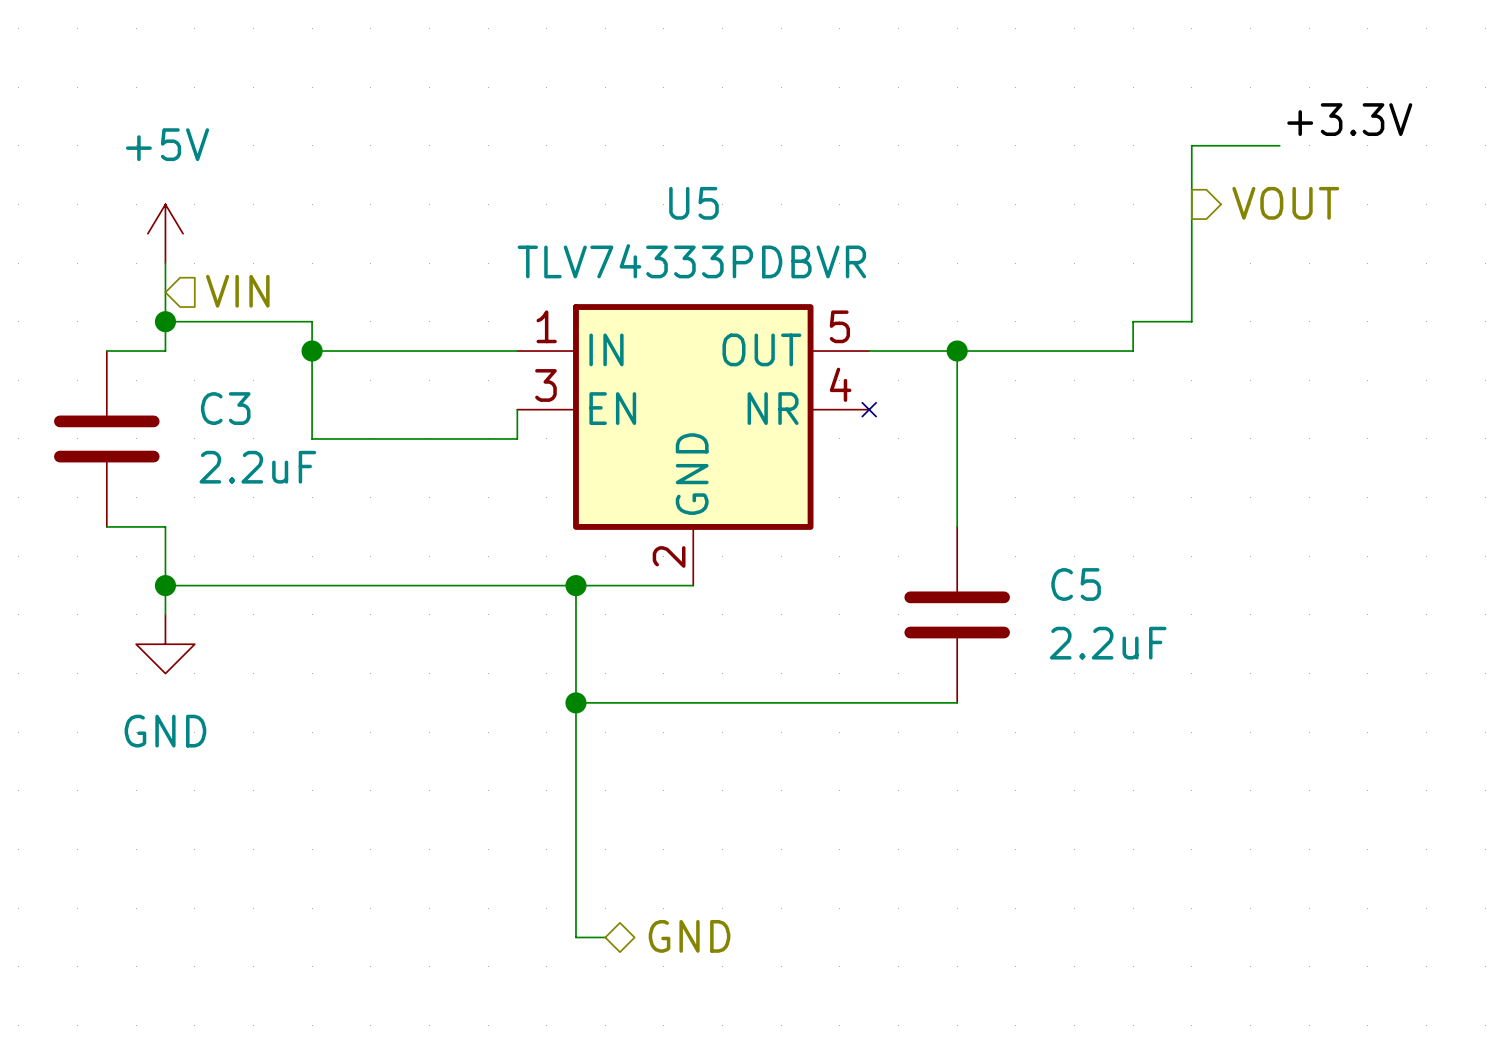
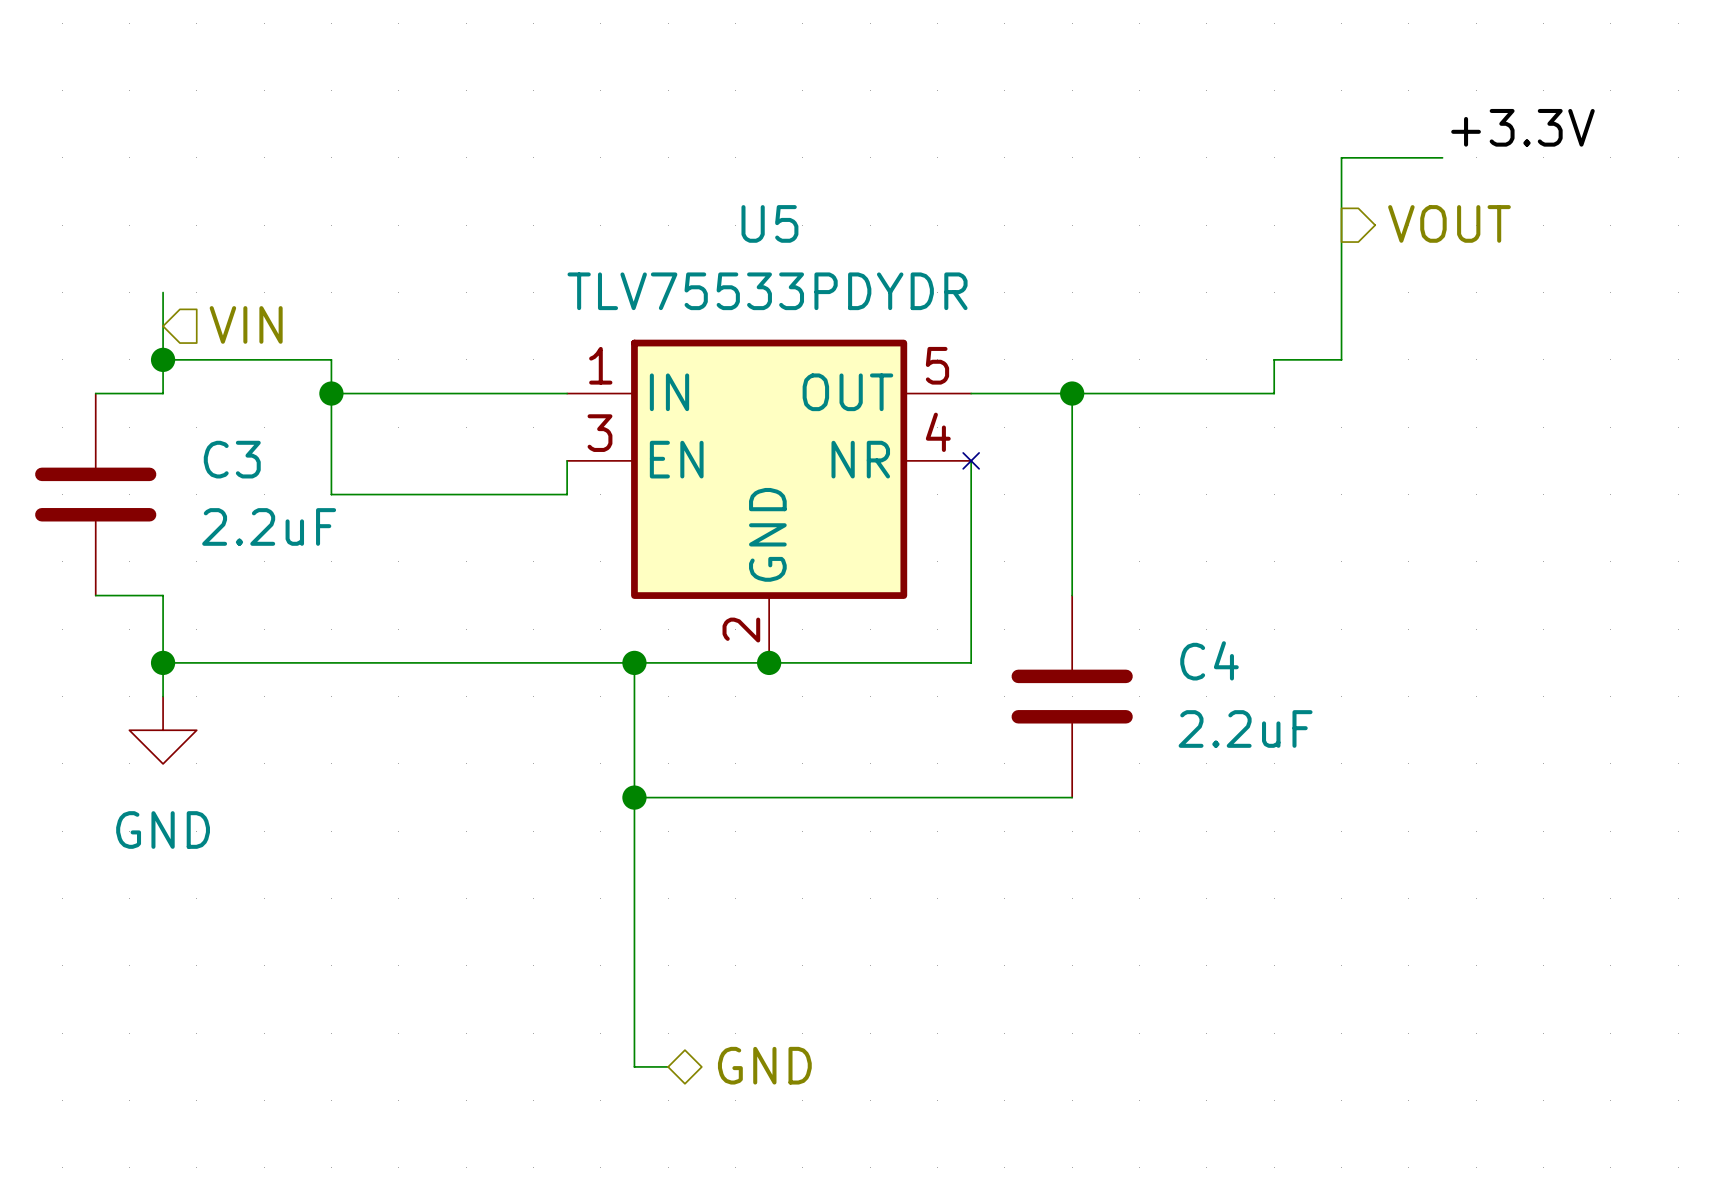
power symbol: +5V (165, 233) -> none
U5 value: TLV74333PDBVR (691, 261) -> TLV75533PDYDR (767, 291)
wire: none -> (971, 460) (971, 662) (769, 662)
C5 name: C5 (1076, 584) -> C4 (1209, 660)
junction: none -> (769, 662)

